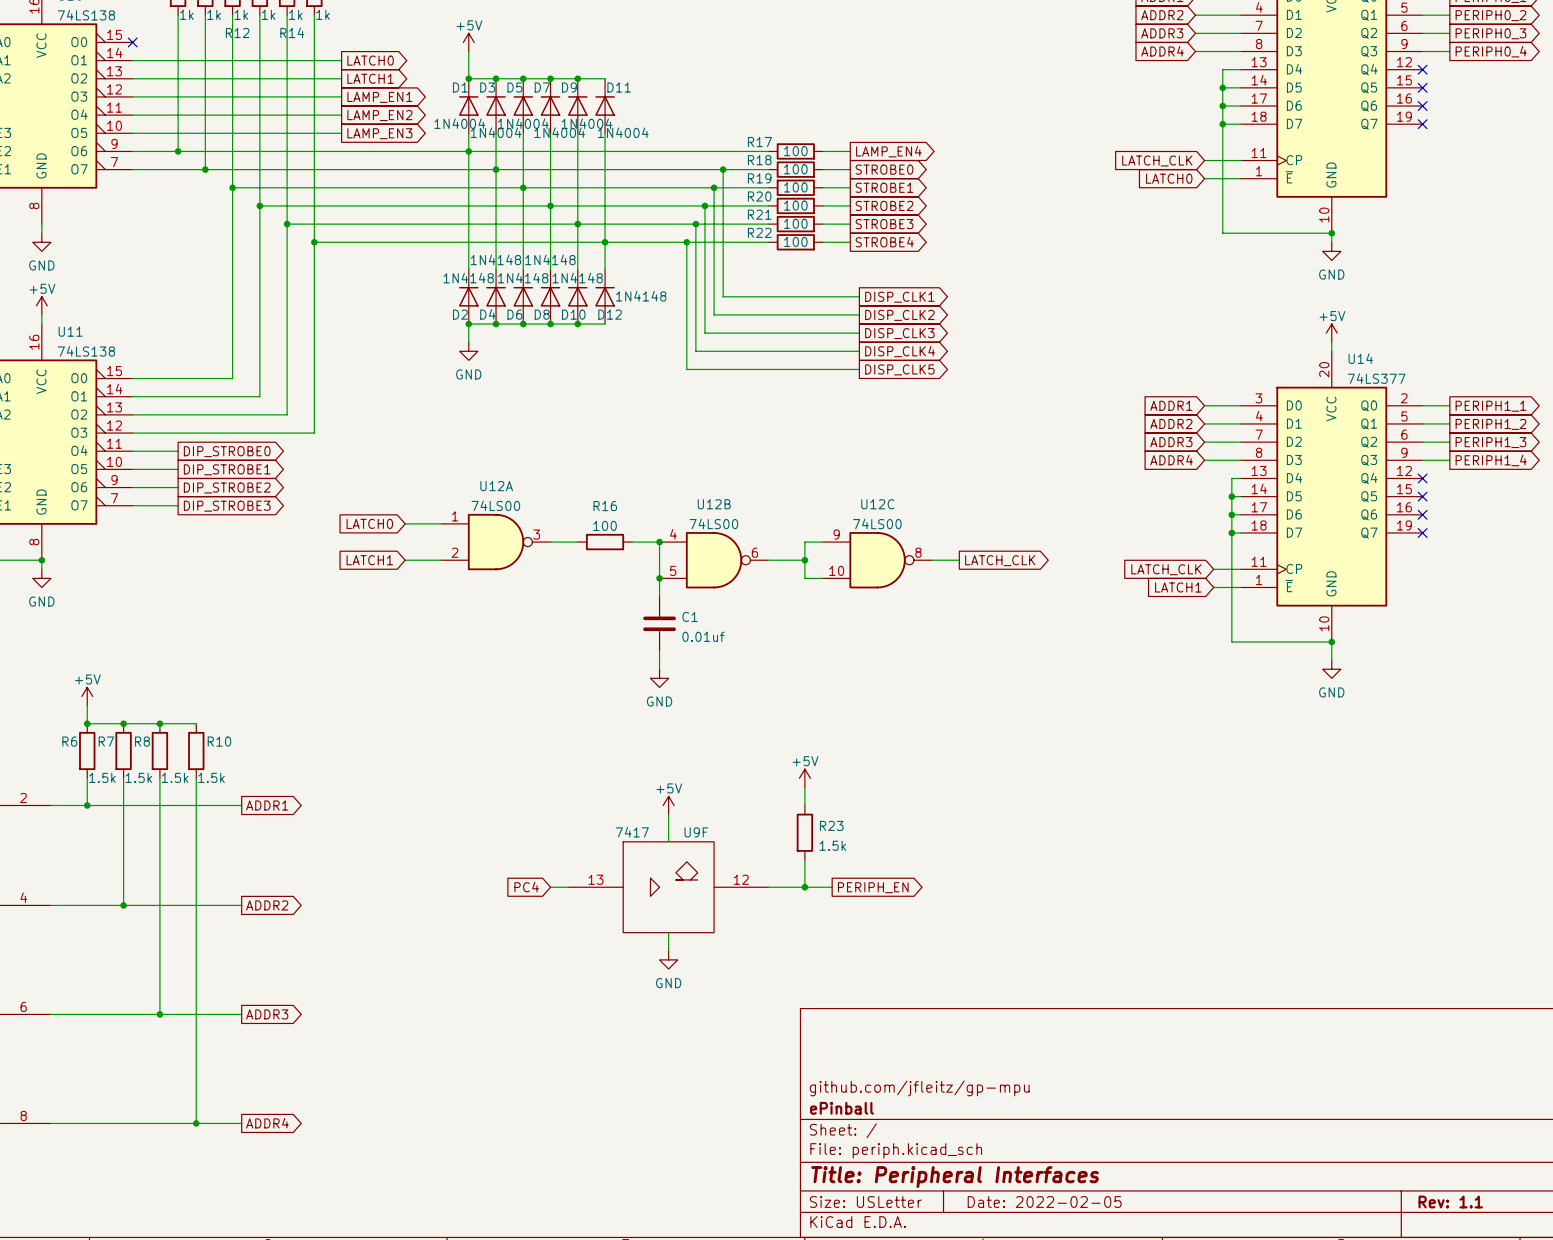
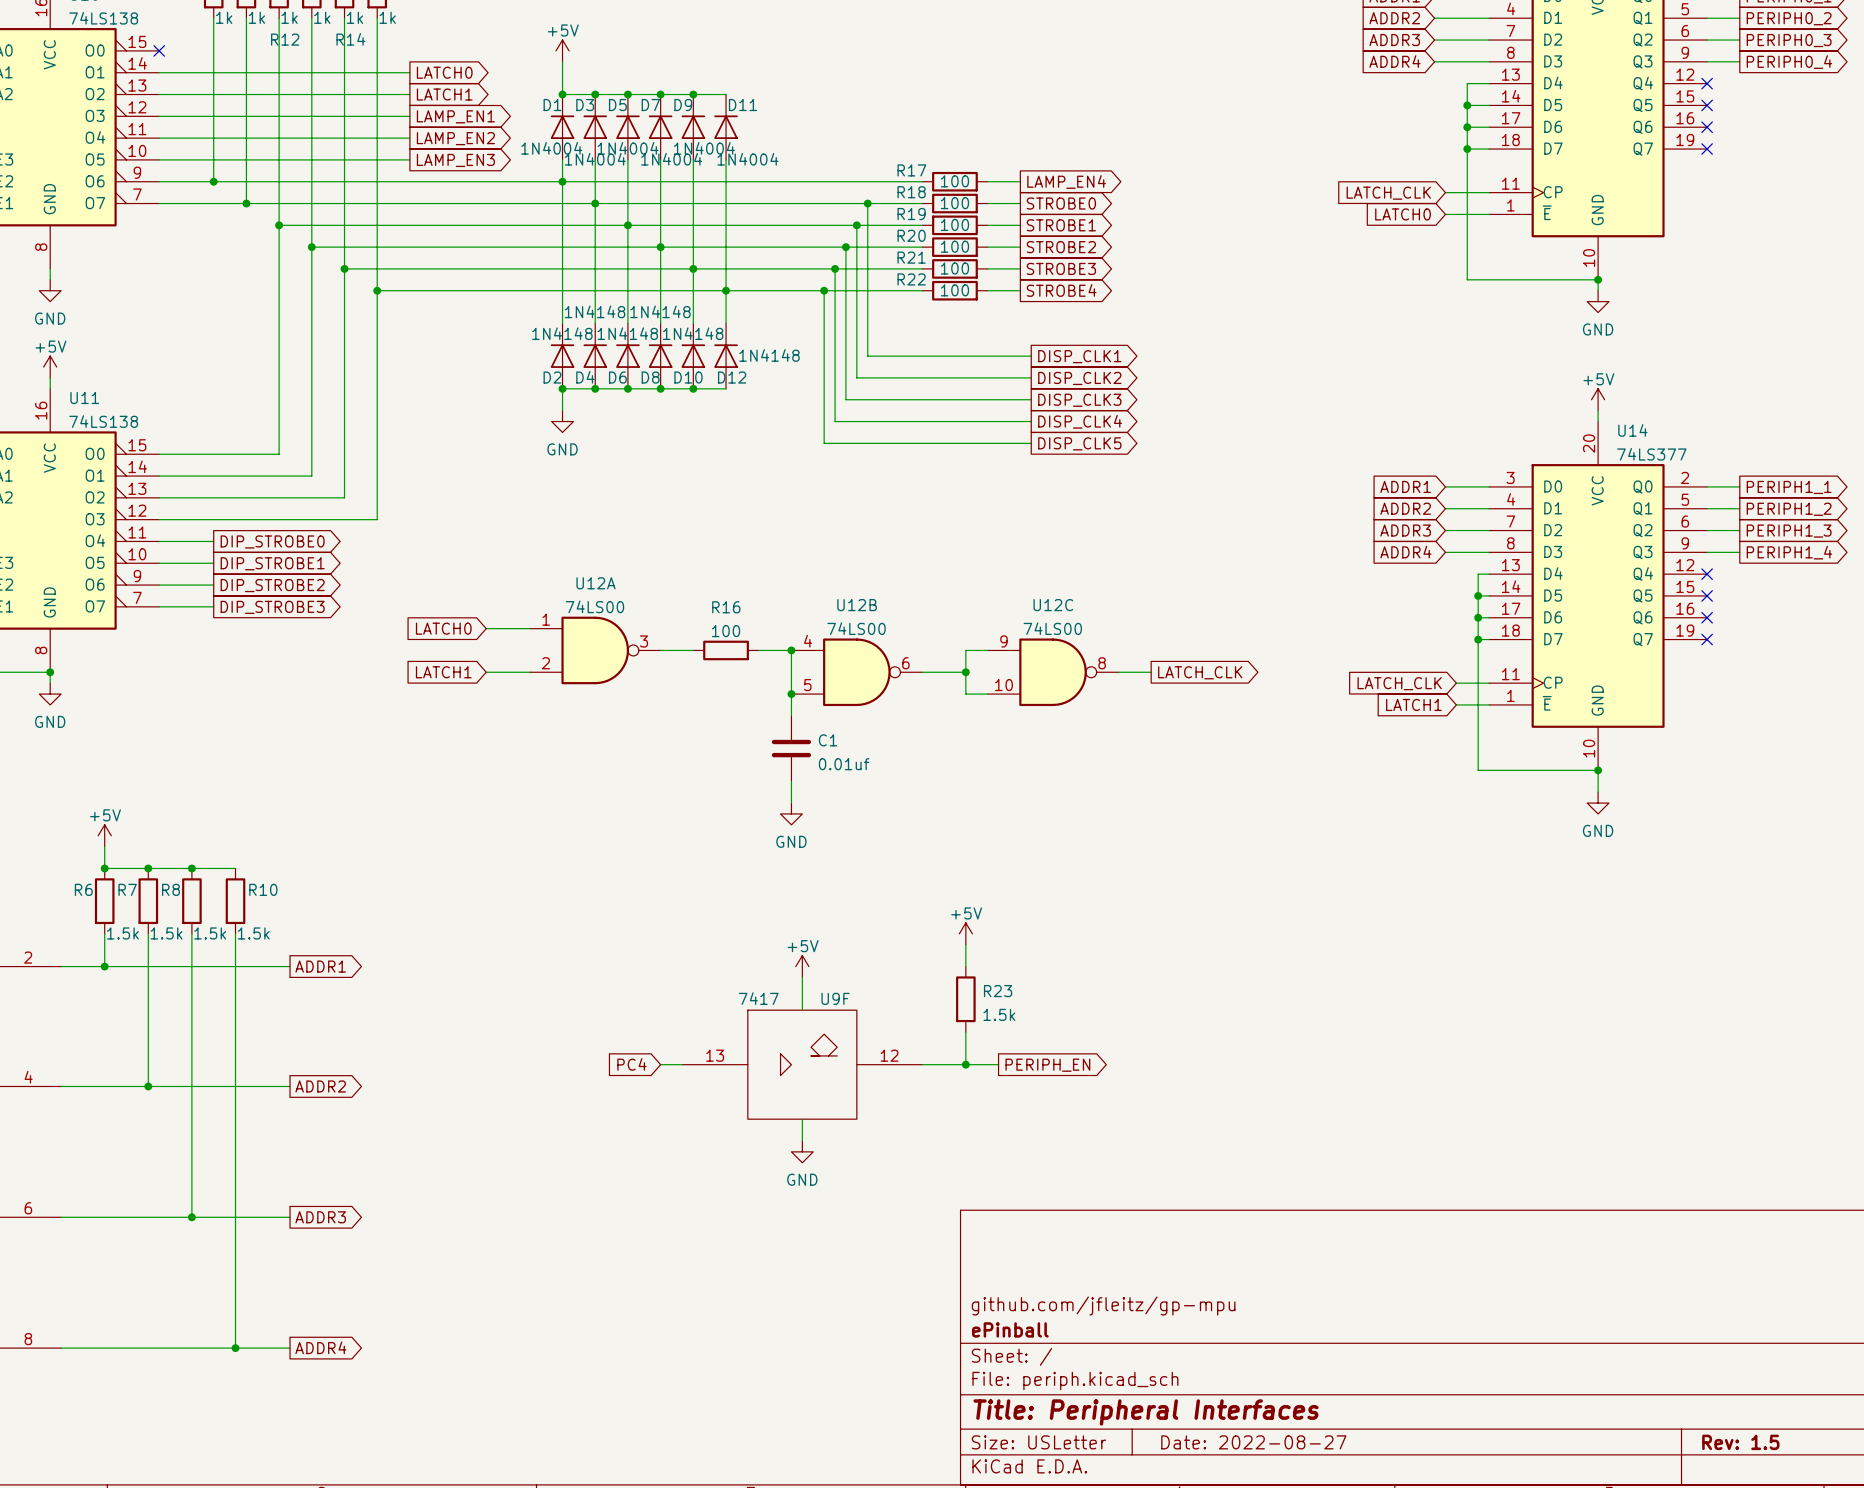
title block: Date: 2022-02-05 (1044, 1202) -> Date: 2022-08-27 (1253, 1442)
title block: Rev: 1.1 (1450, 1202) -> Rev: 1.5 (1740, 1442)

